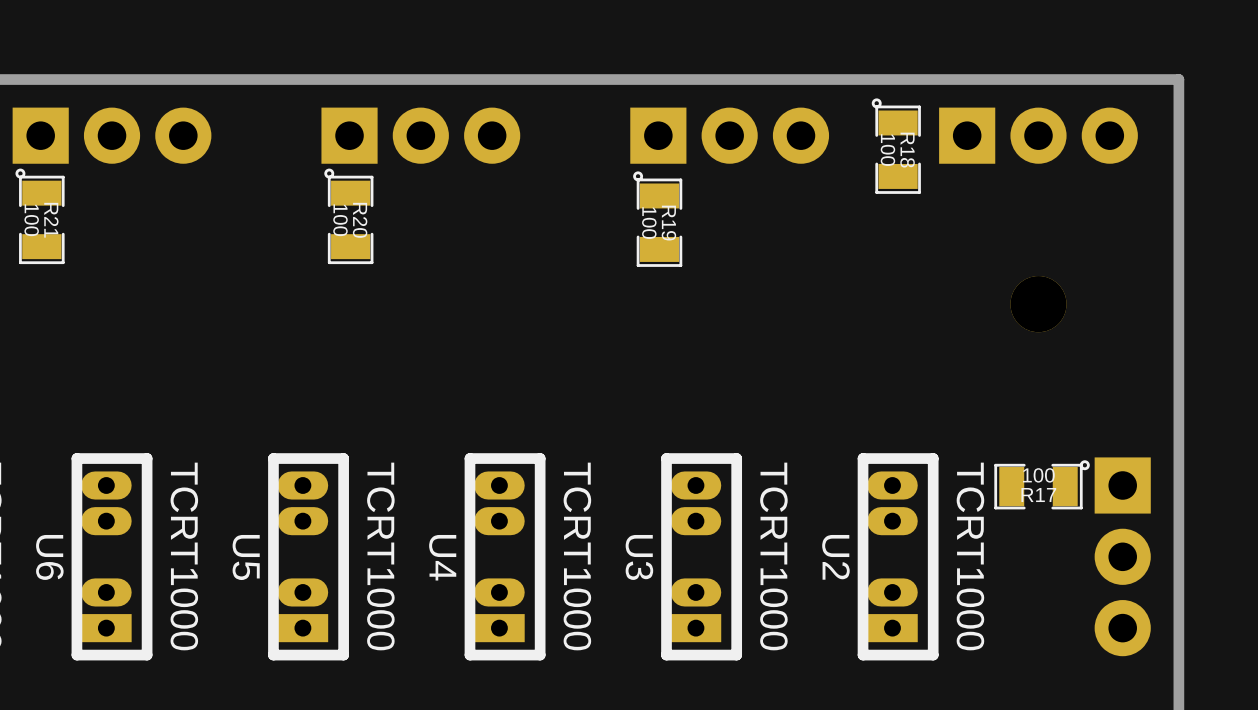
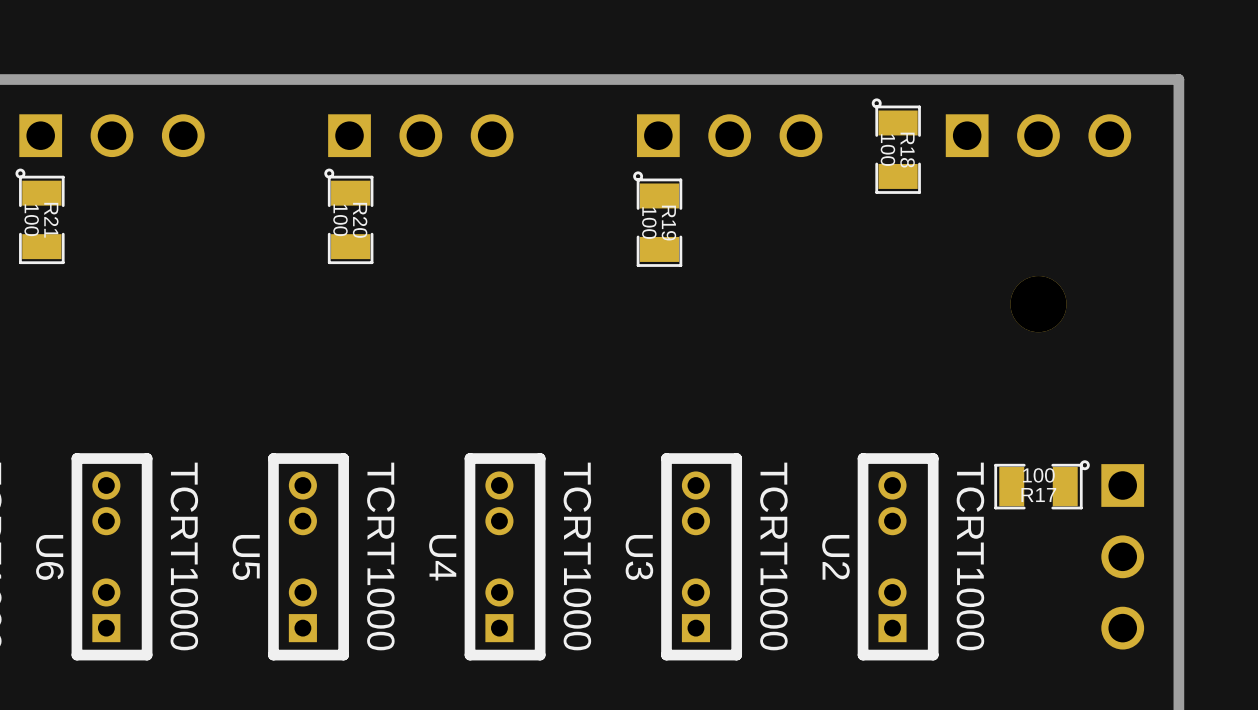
part footprint: [12, 107, 212, 164] -> [19, 114, 205, 158]
part footprint: [321, 107, 521, 164] -> [328, 114, 514, 158]
part footprint: [630, 107, 830, 164] -> [636, 114, 823, 158]
part footprint: [939, 107, 1138, 164] -> [945, 114, 1132, 158]
U6 footprint: [71, 453, 153, 661] -> [71, 453, 153, 661]
U5 footprint: [268, 453, 349, 661] -> [268, 453, 349, 661]
U4 footprint: [464, 453, 546, 661] -> [464, 453, 546, 661]
U3 footprint: [661, 453, 743, 661] -> [661, 453, 743, 661]
U2 footprint: [857, 453, 939, 661] -> [857, 453, 939, 661]
part footprint: [1094, 457, 1151, 657] -> [1101, 464, 1145, 650]

